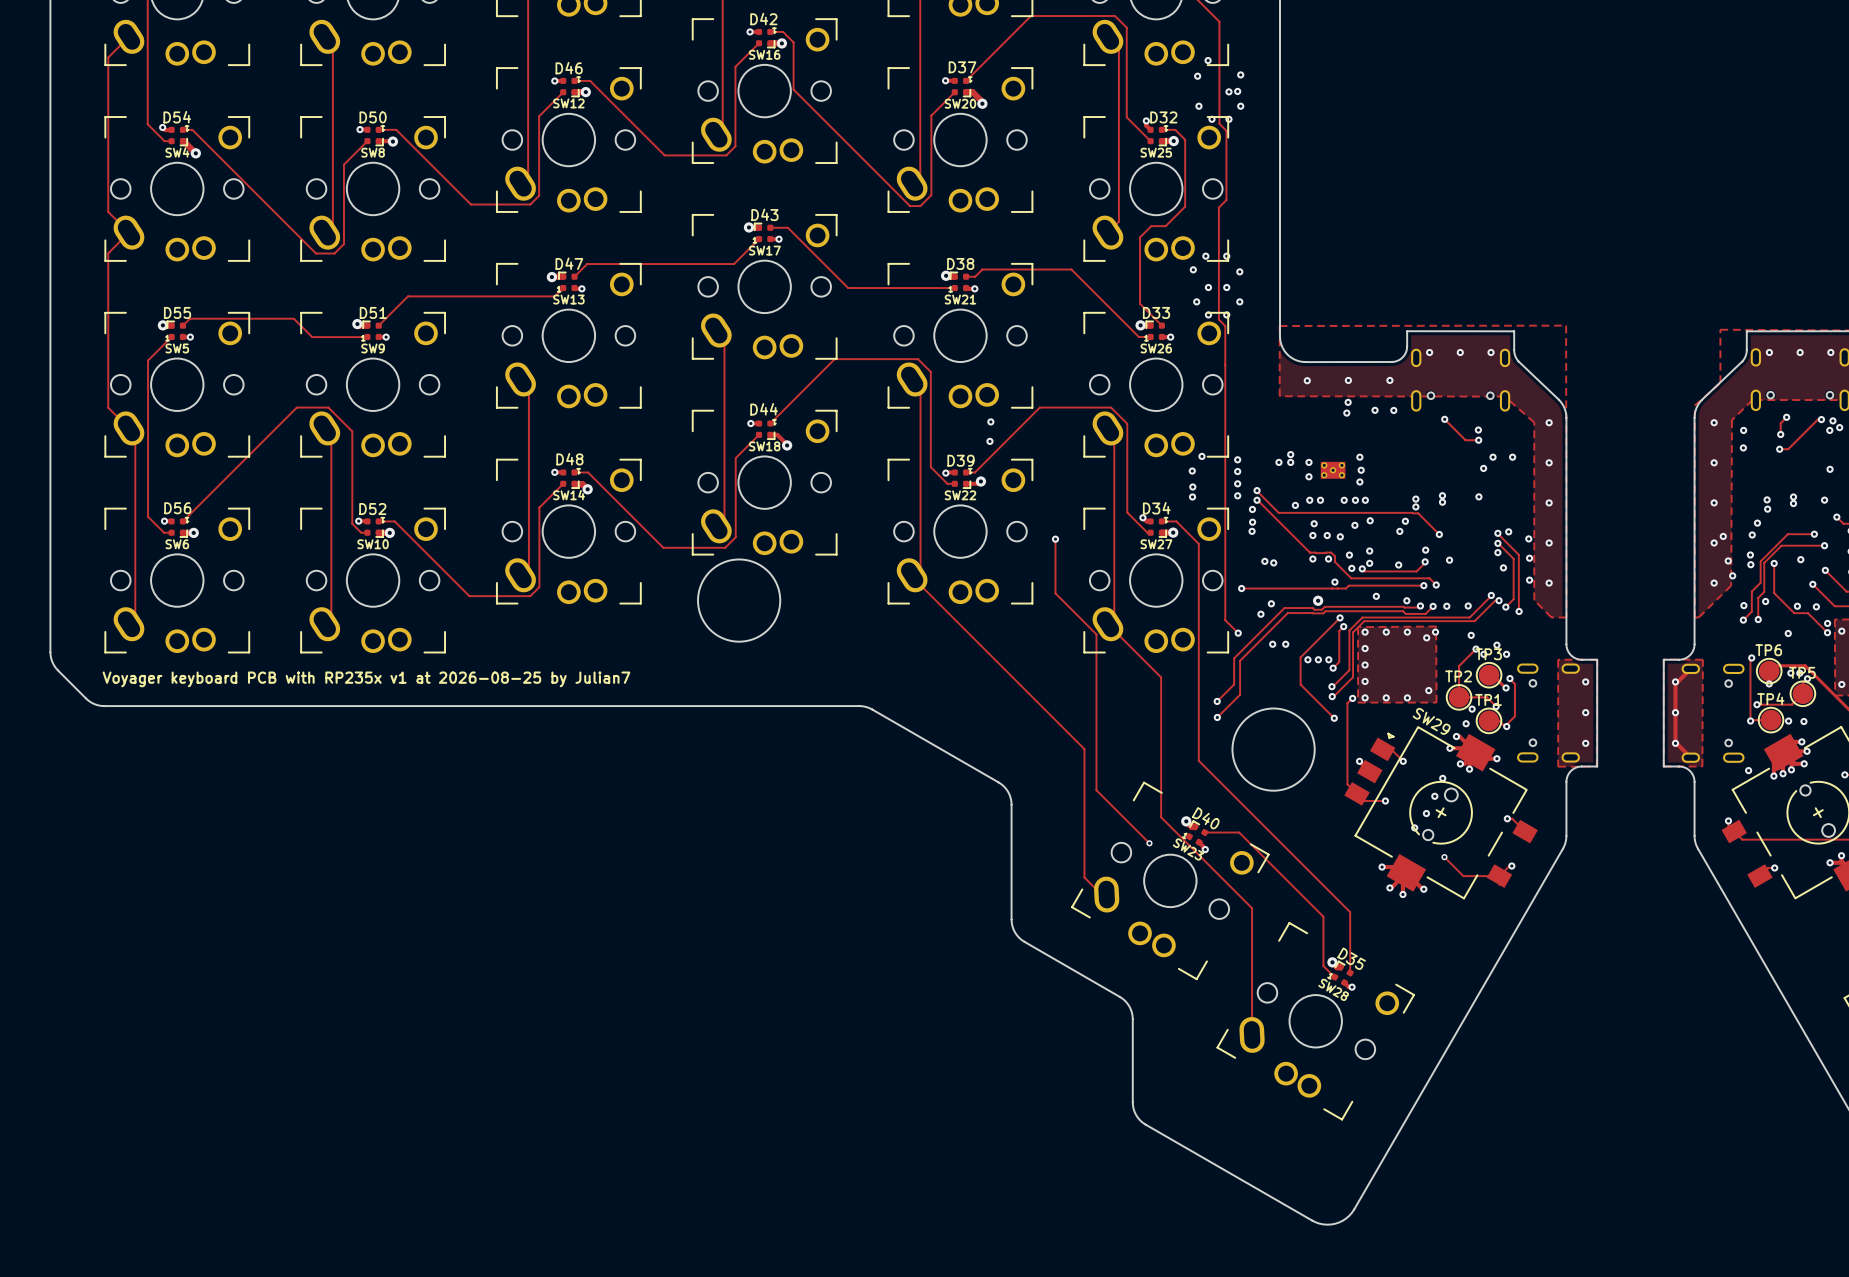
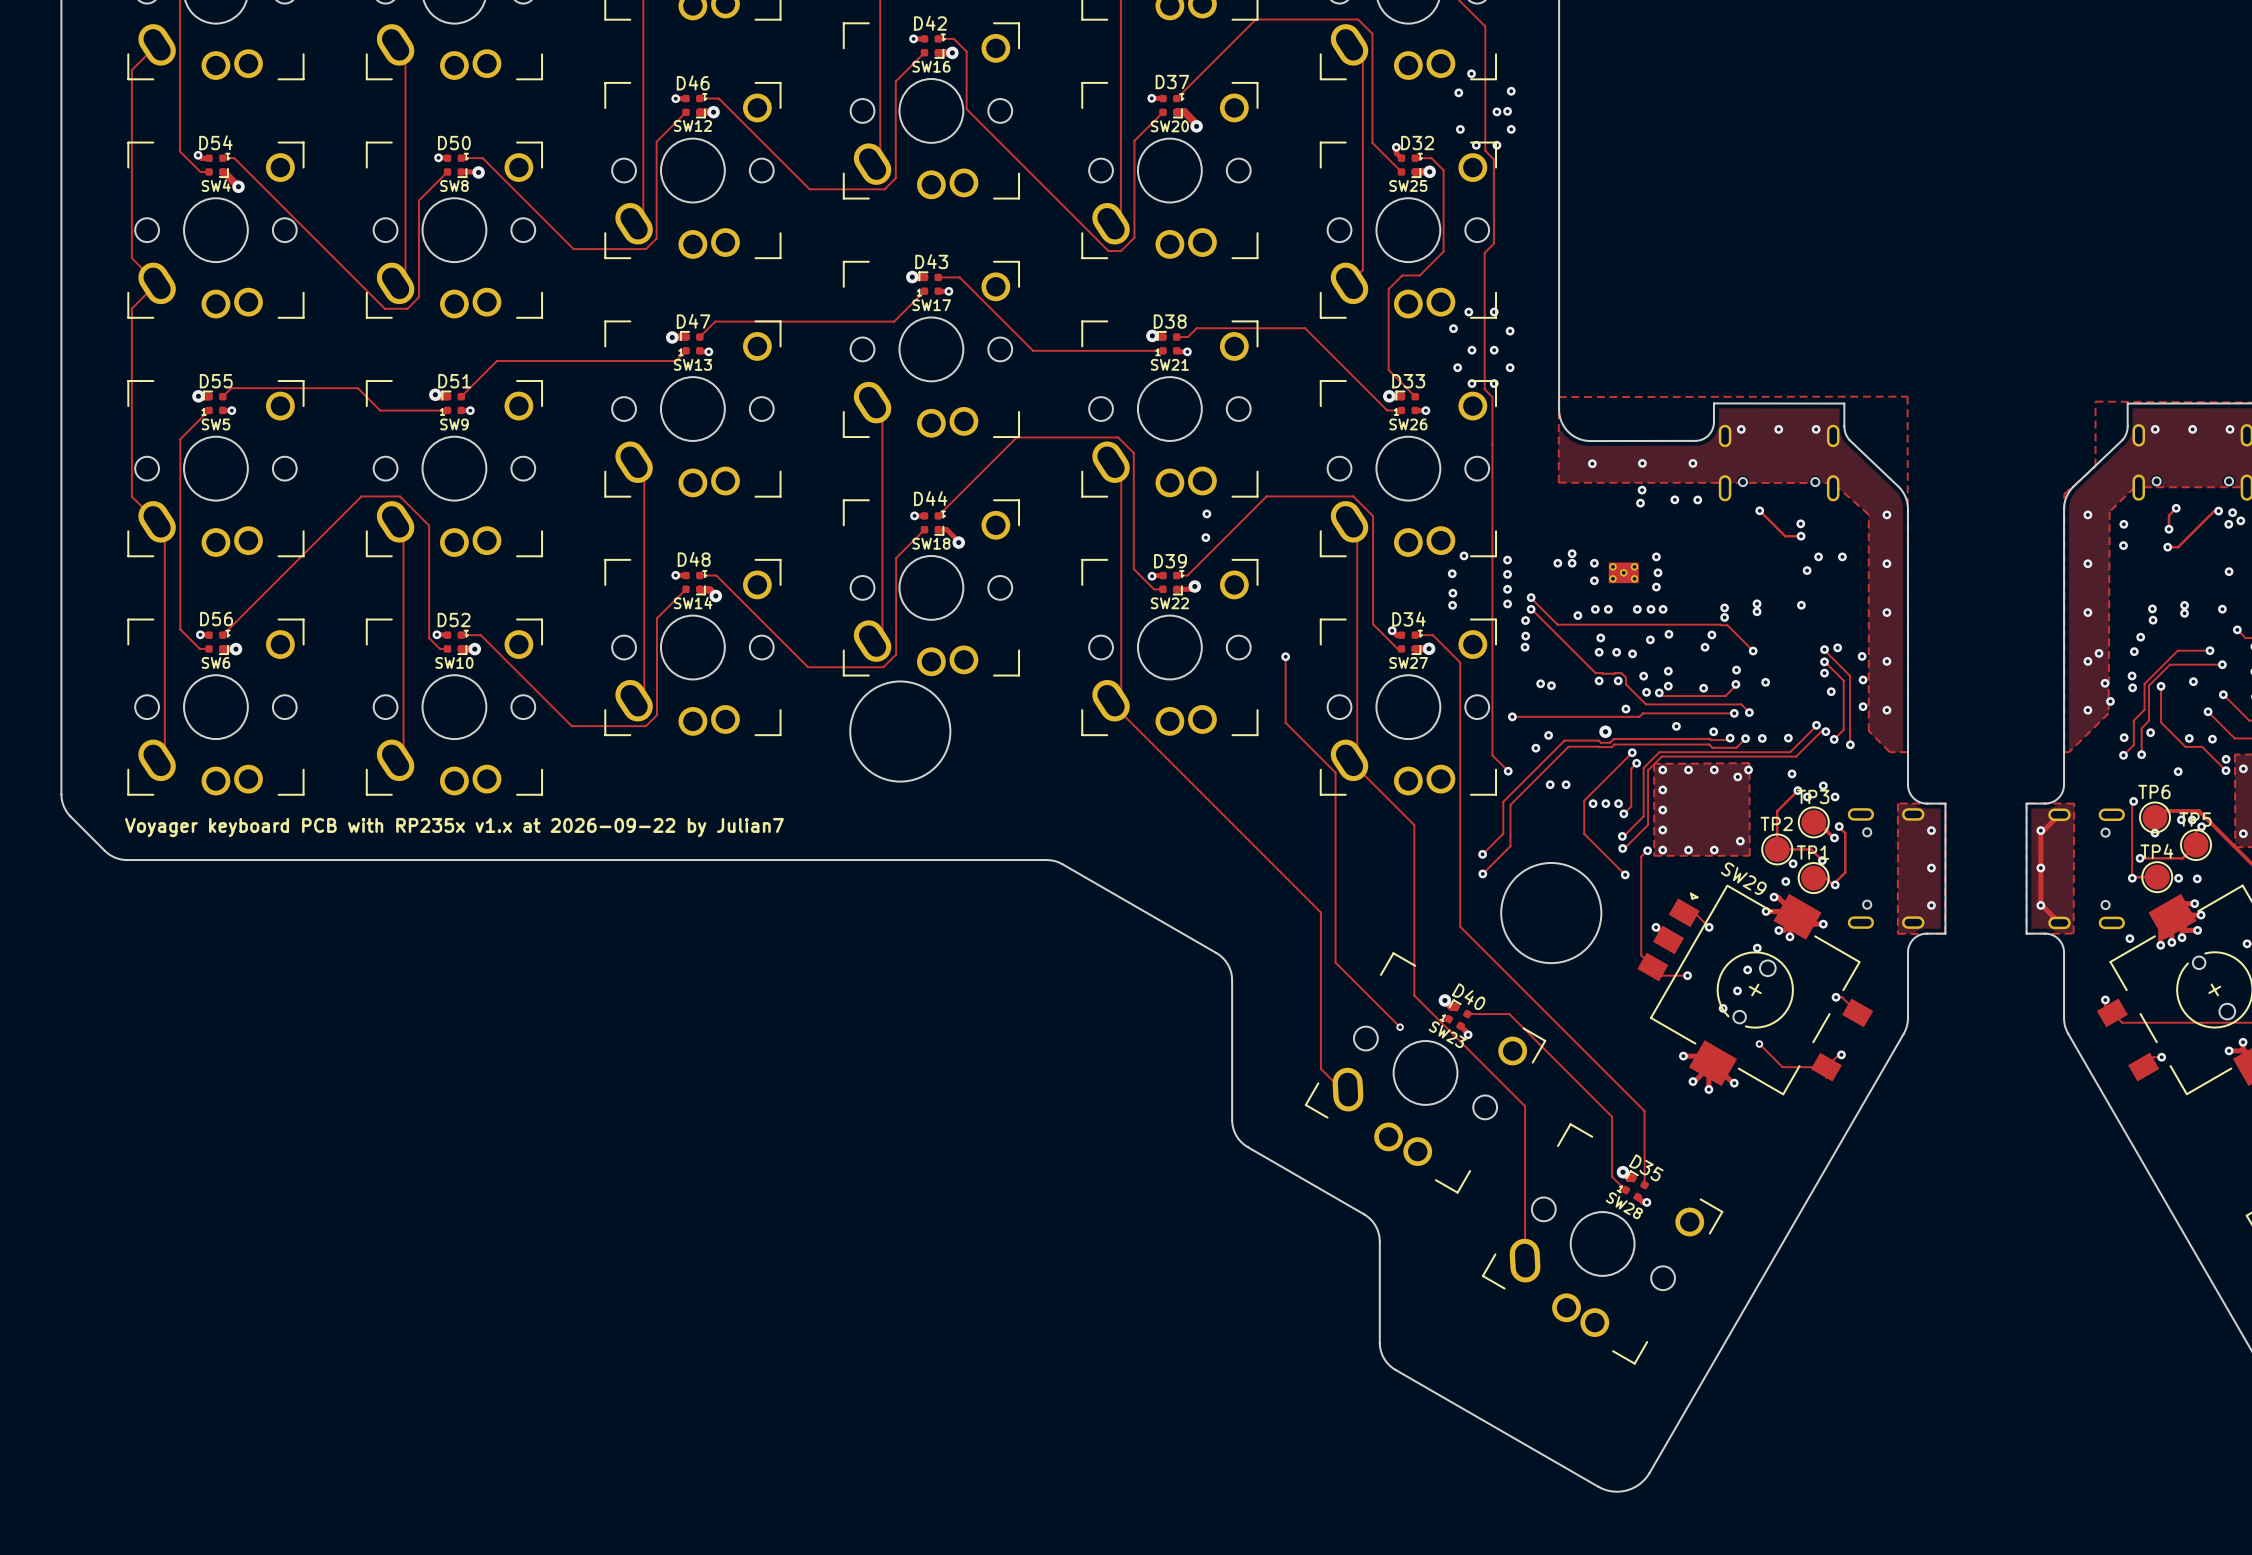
text: Voyager keyboard PCB with RP235x v1 at 2026-08-25 by Julian7 (366, 679) -> Voyager keyboard PCB with RP235x v1.x at 2026-09-22 by Julian7 (454, 827)

